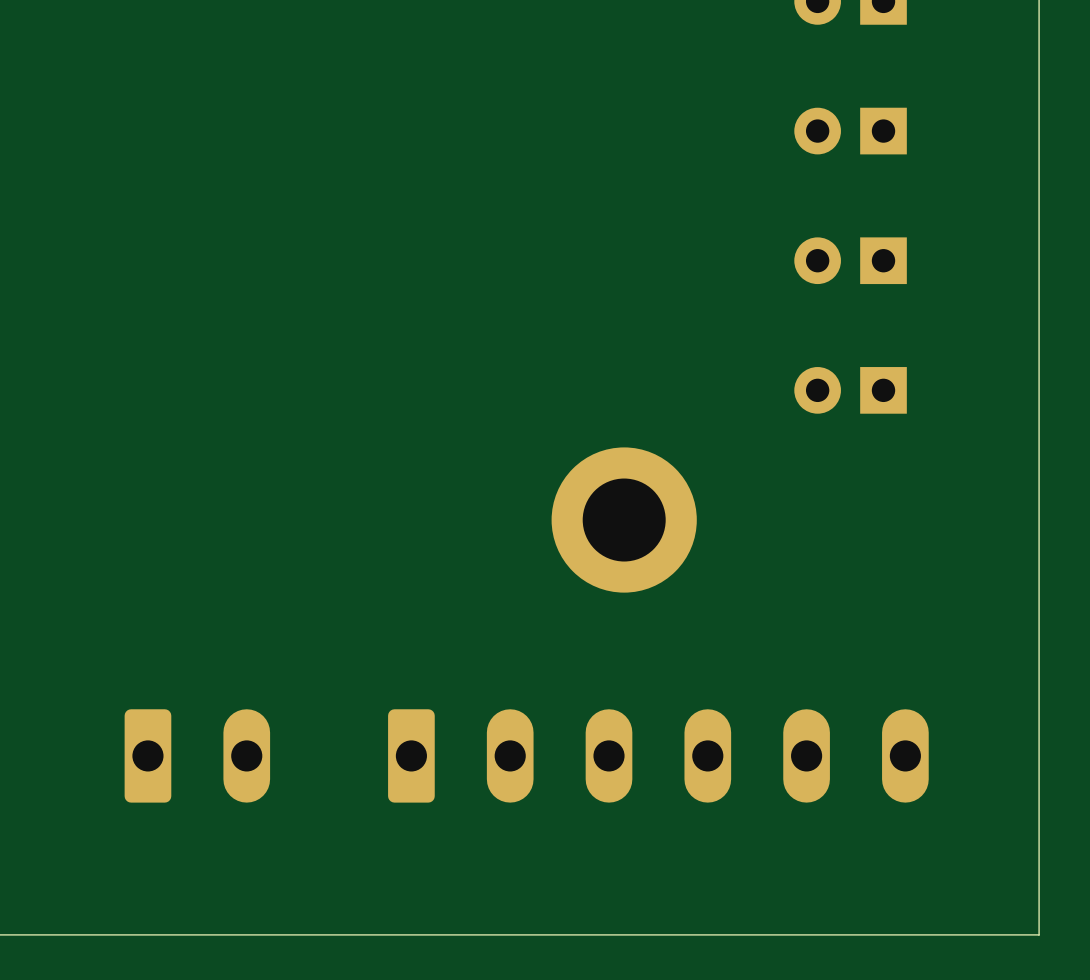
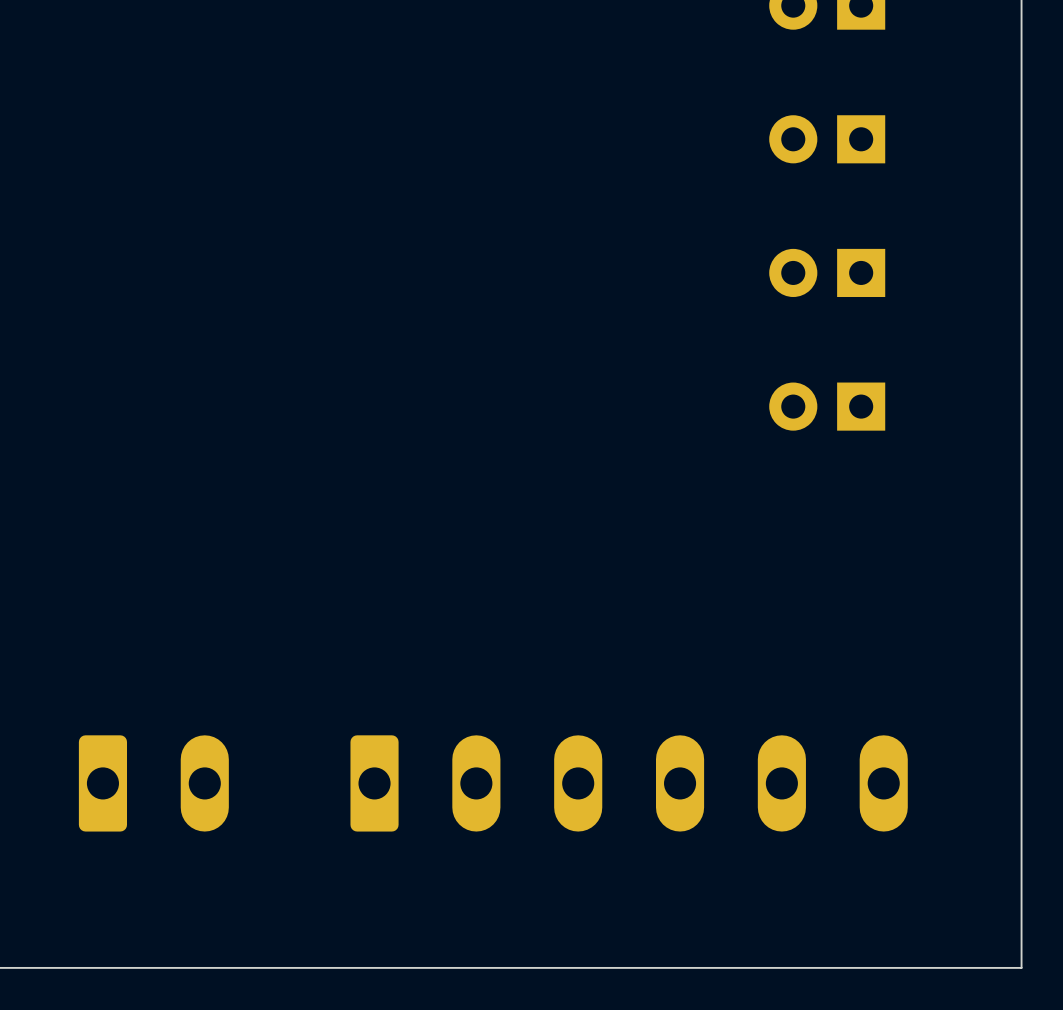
part: (624, 520) -> none

